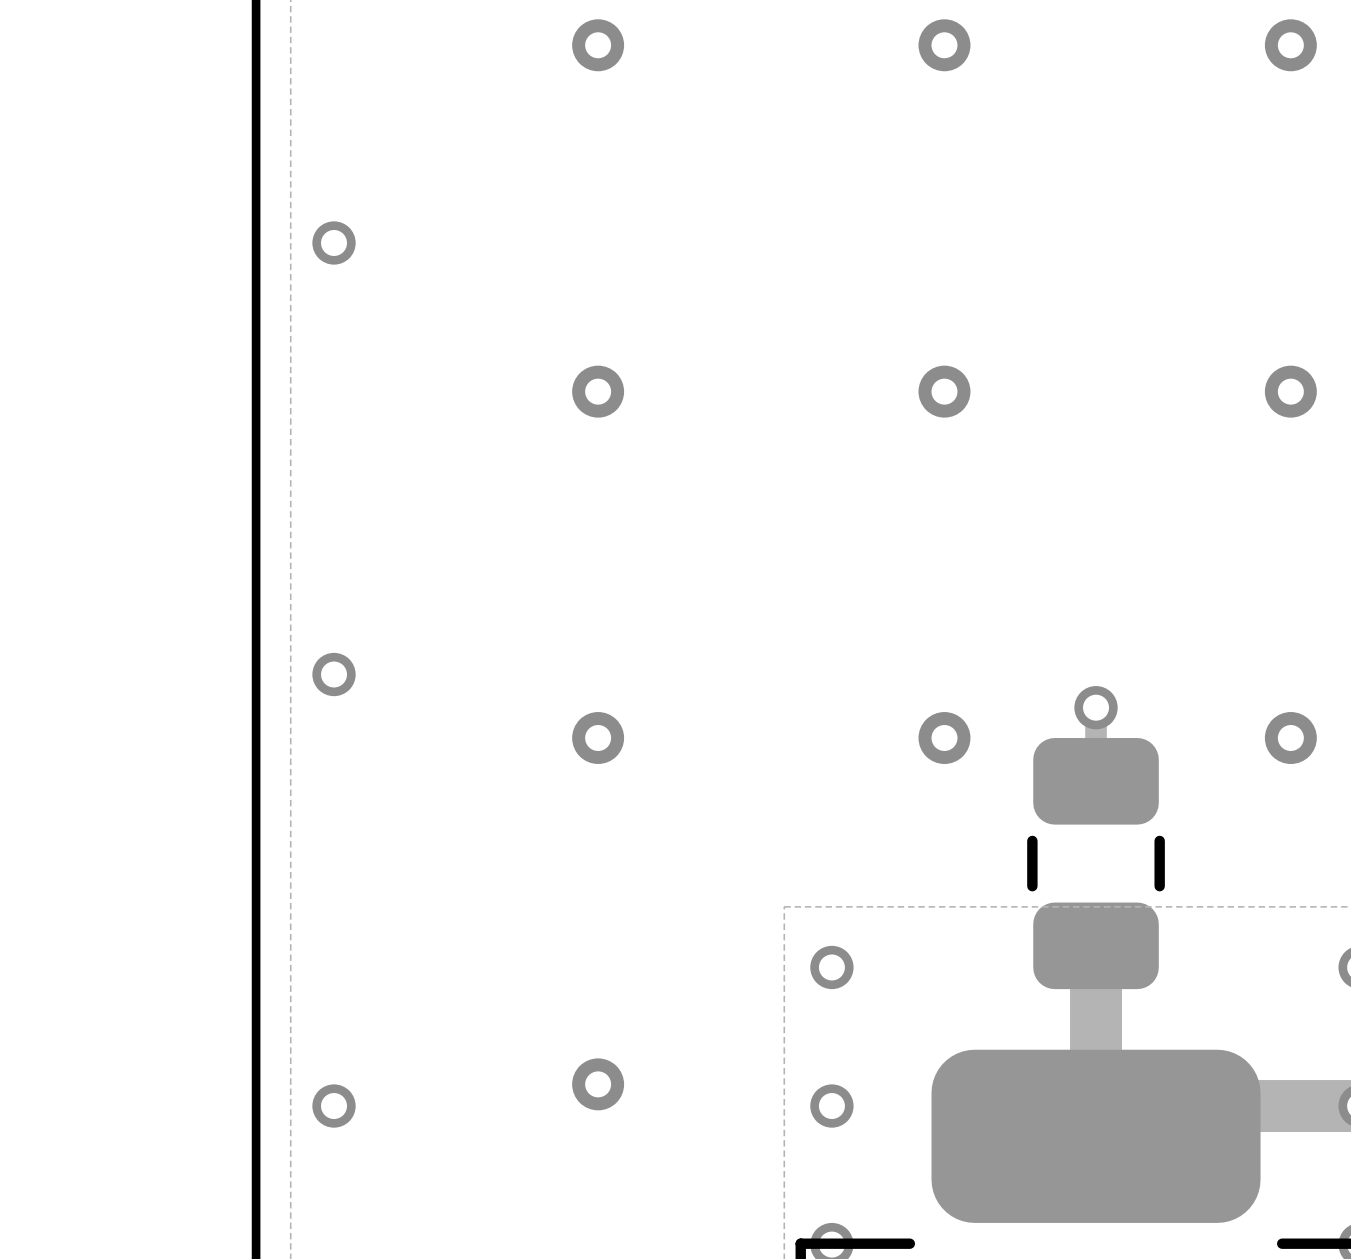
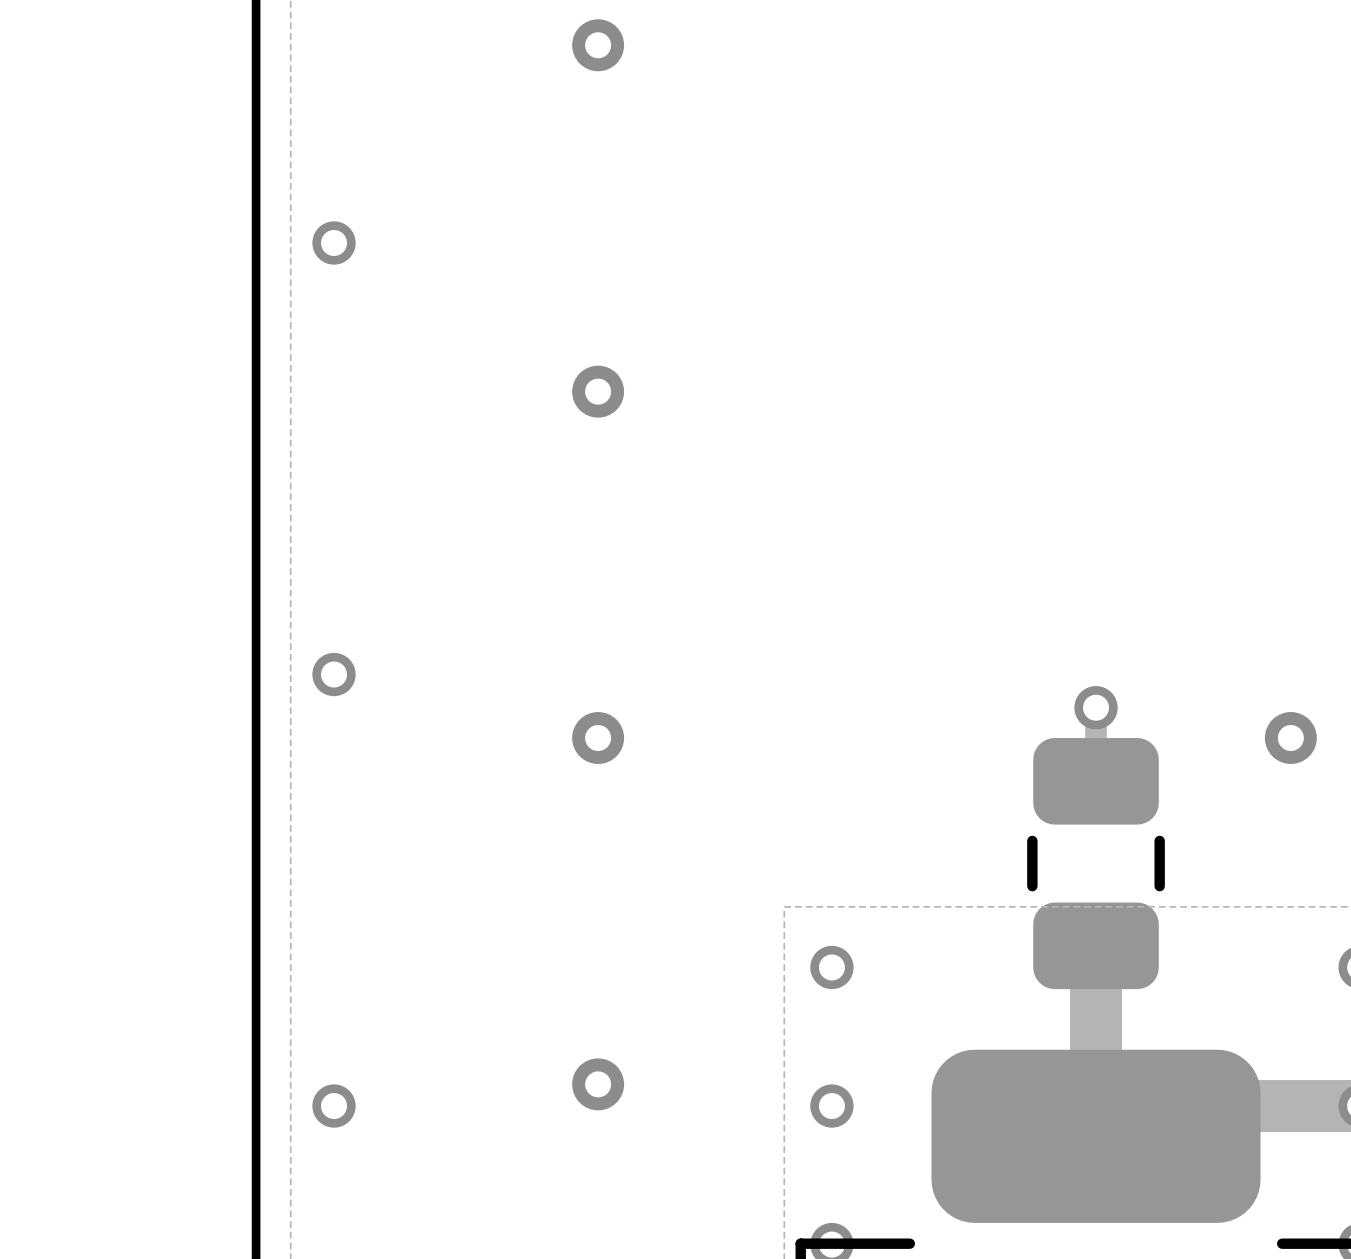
via: (944, 45) -> none
via: (1290, 45) -> none
via: (944, 391) -> none
via: (1290, 391) -> none
via: (944, 738) -> none

